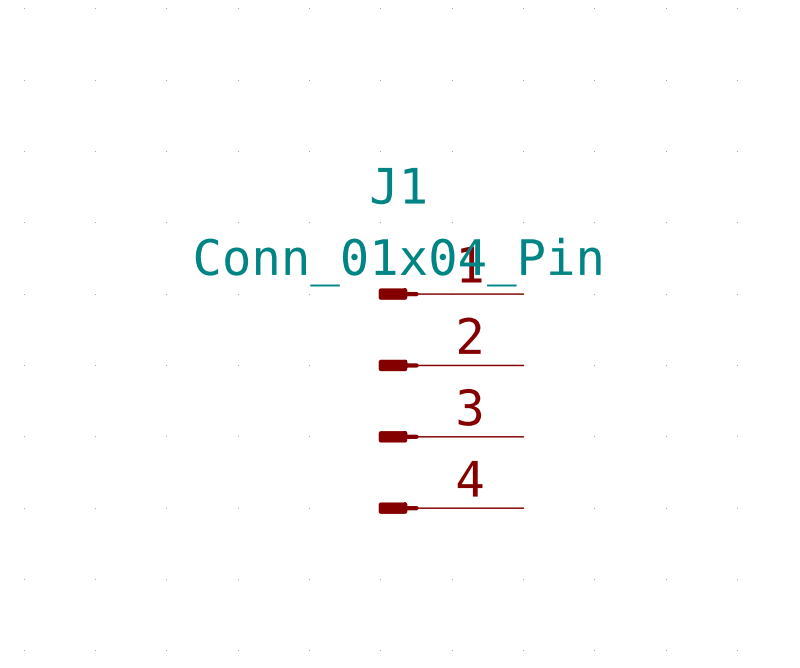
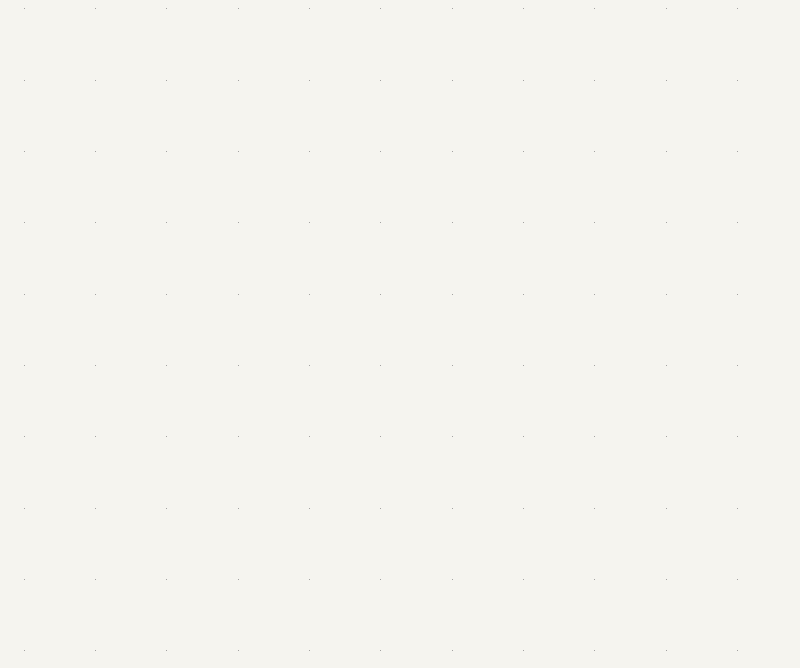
J1: Conn_01x04_Pin (451, 401) -> none

